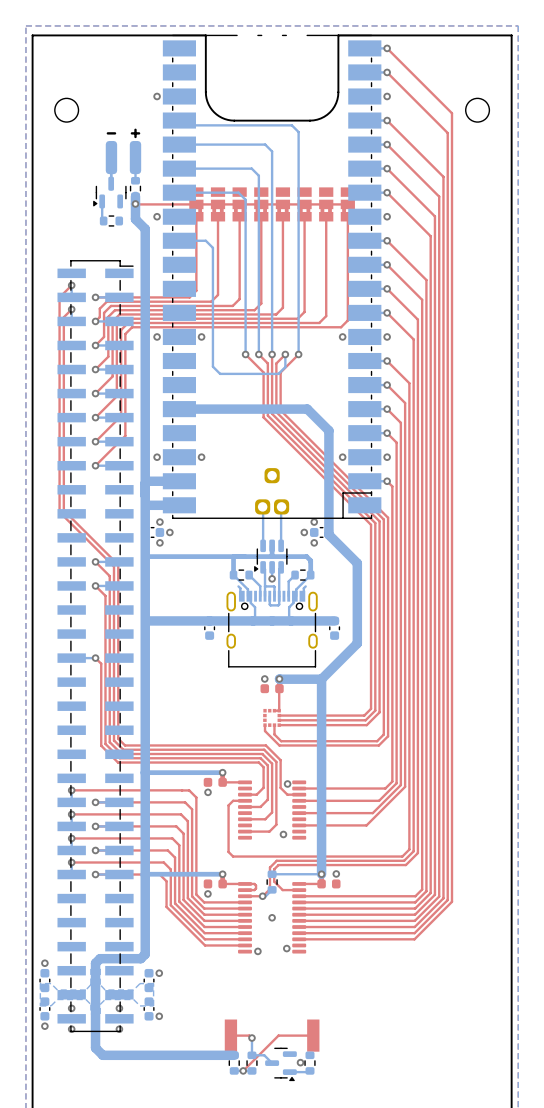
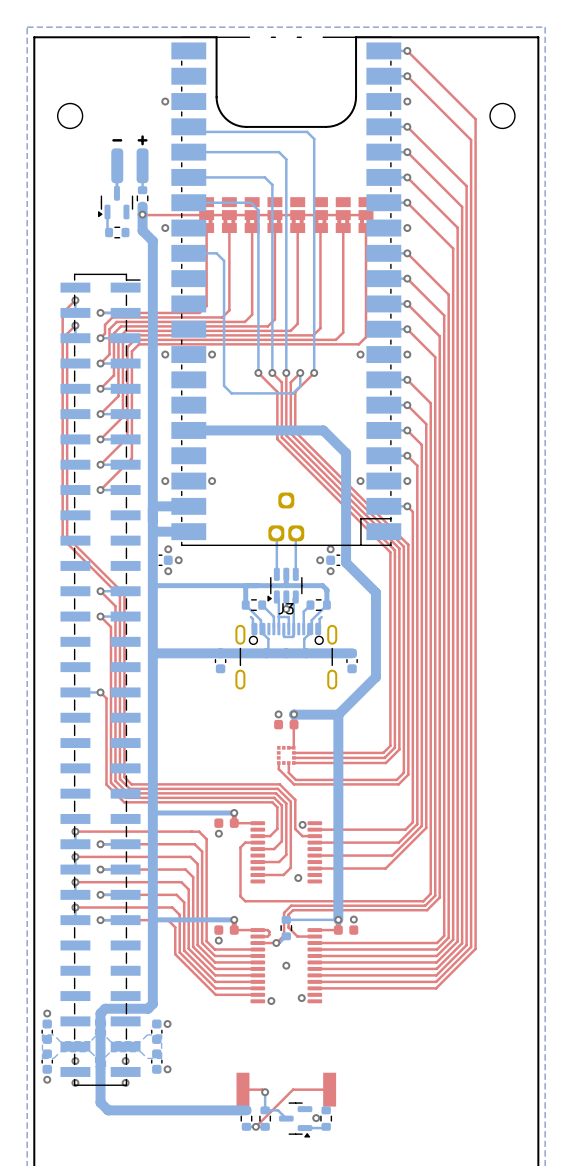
J3: none -> (286, 656)
part: (272, 629) -> none

